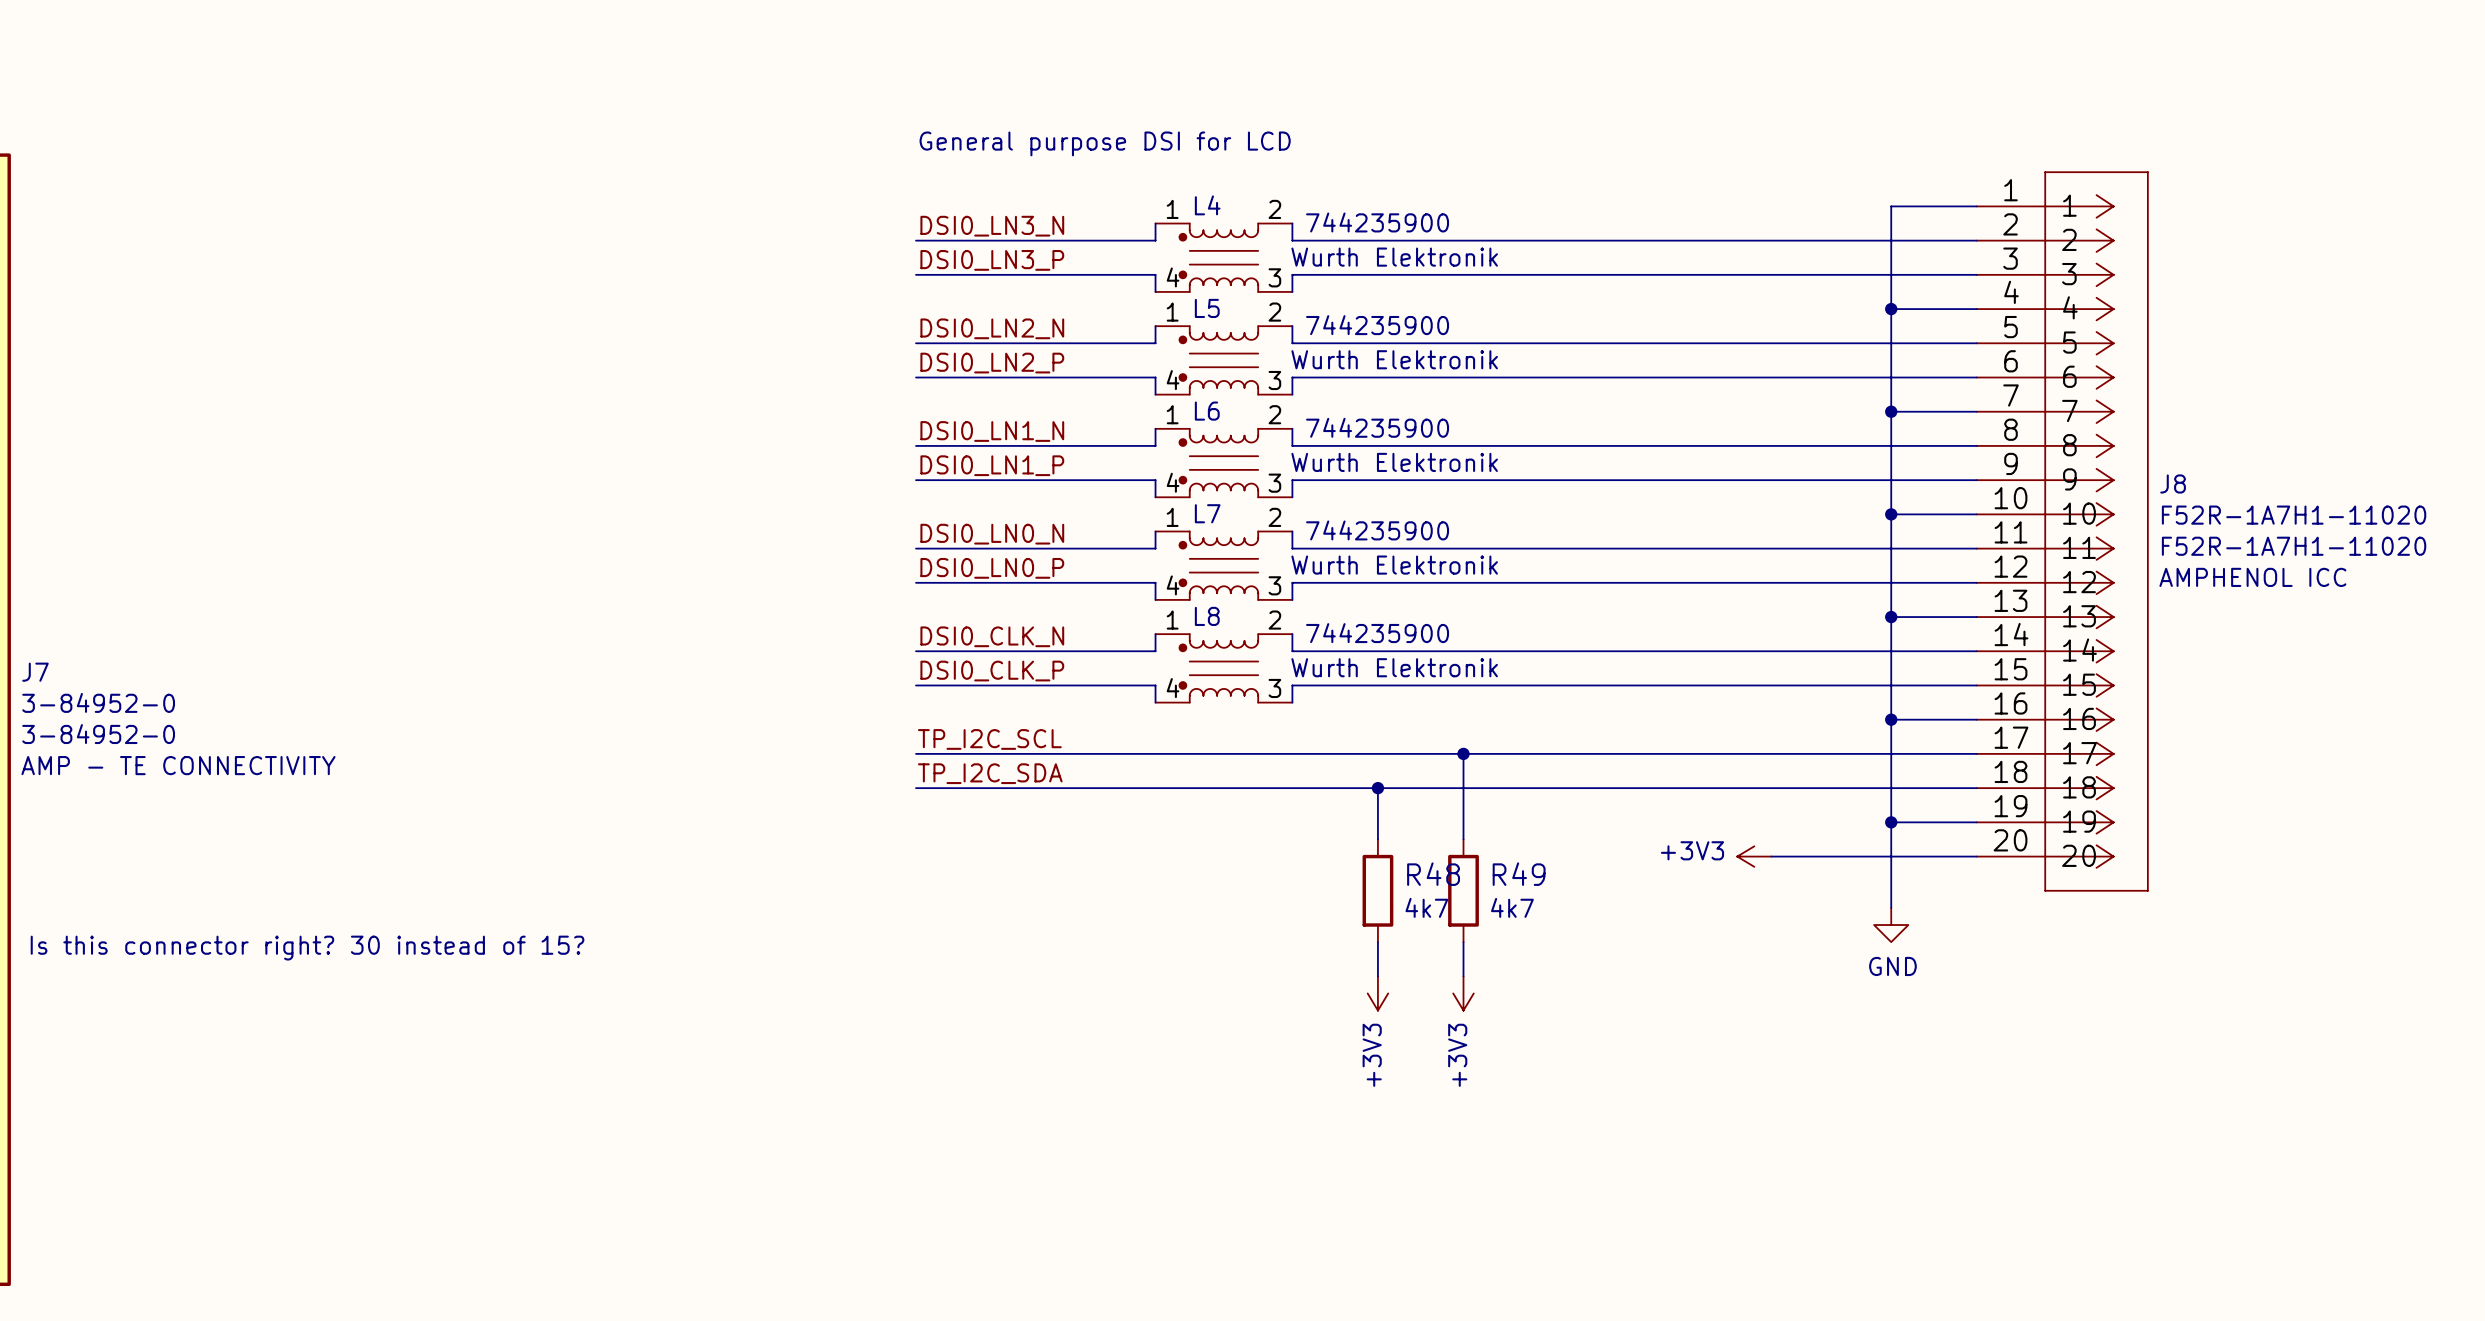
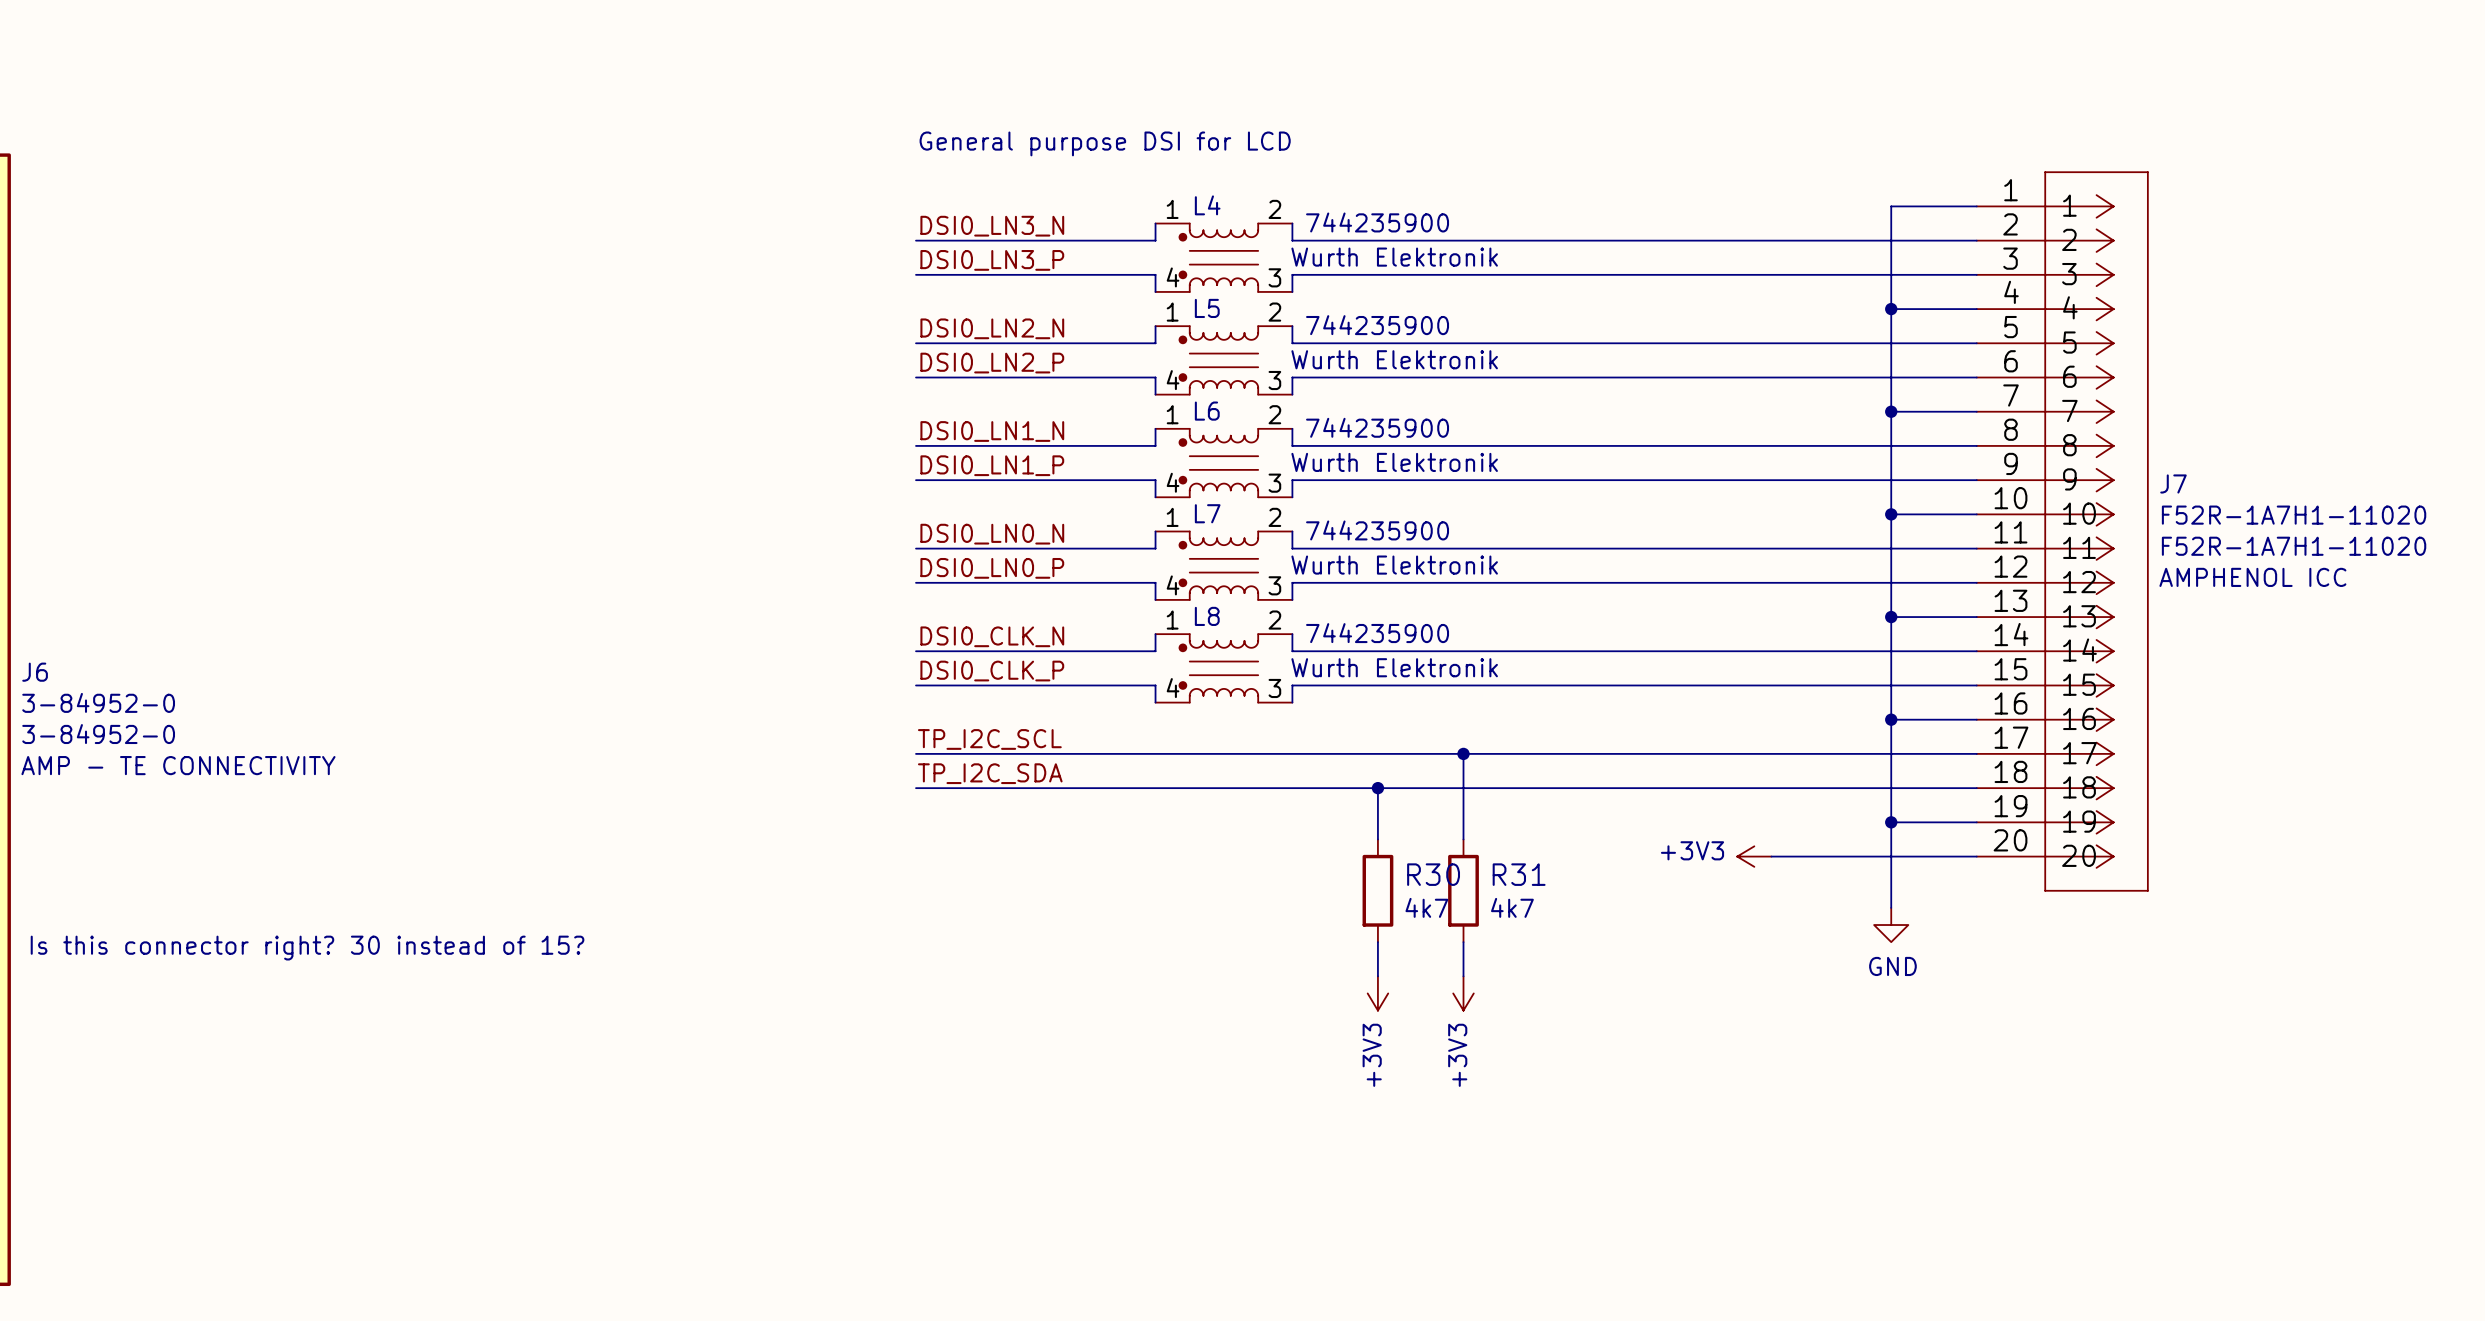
J8 name: J8 (2173, 483) -> J7 (2173, 483)
J7 name: J7 (35, 672) -> J6 (35, 672)
R48 name: R48 (1433, 874) -> R30 (1433, 874)
R49 name: R49 (1519, 874) -> R31 (1519, 874)

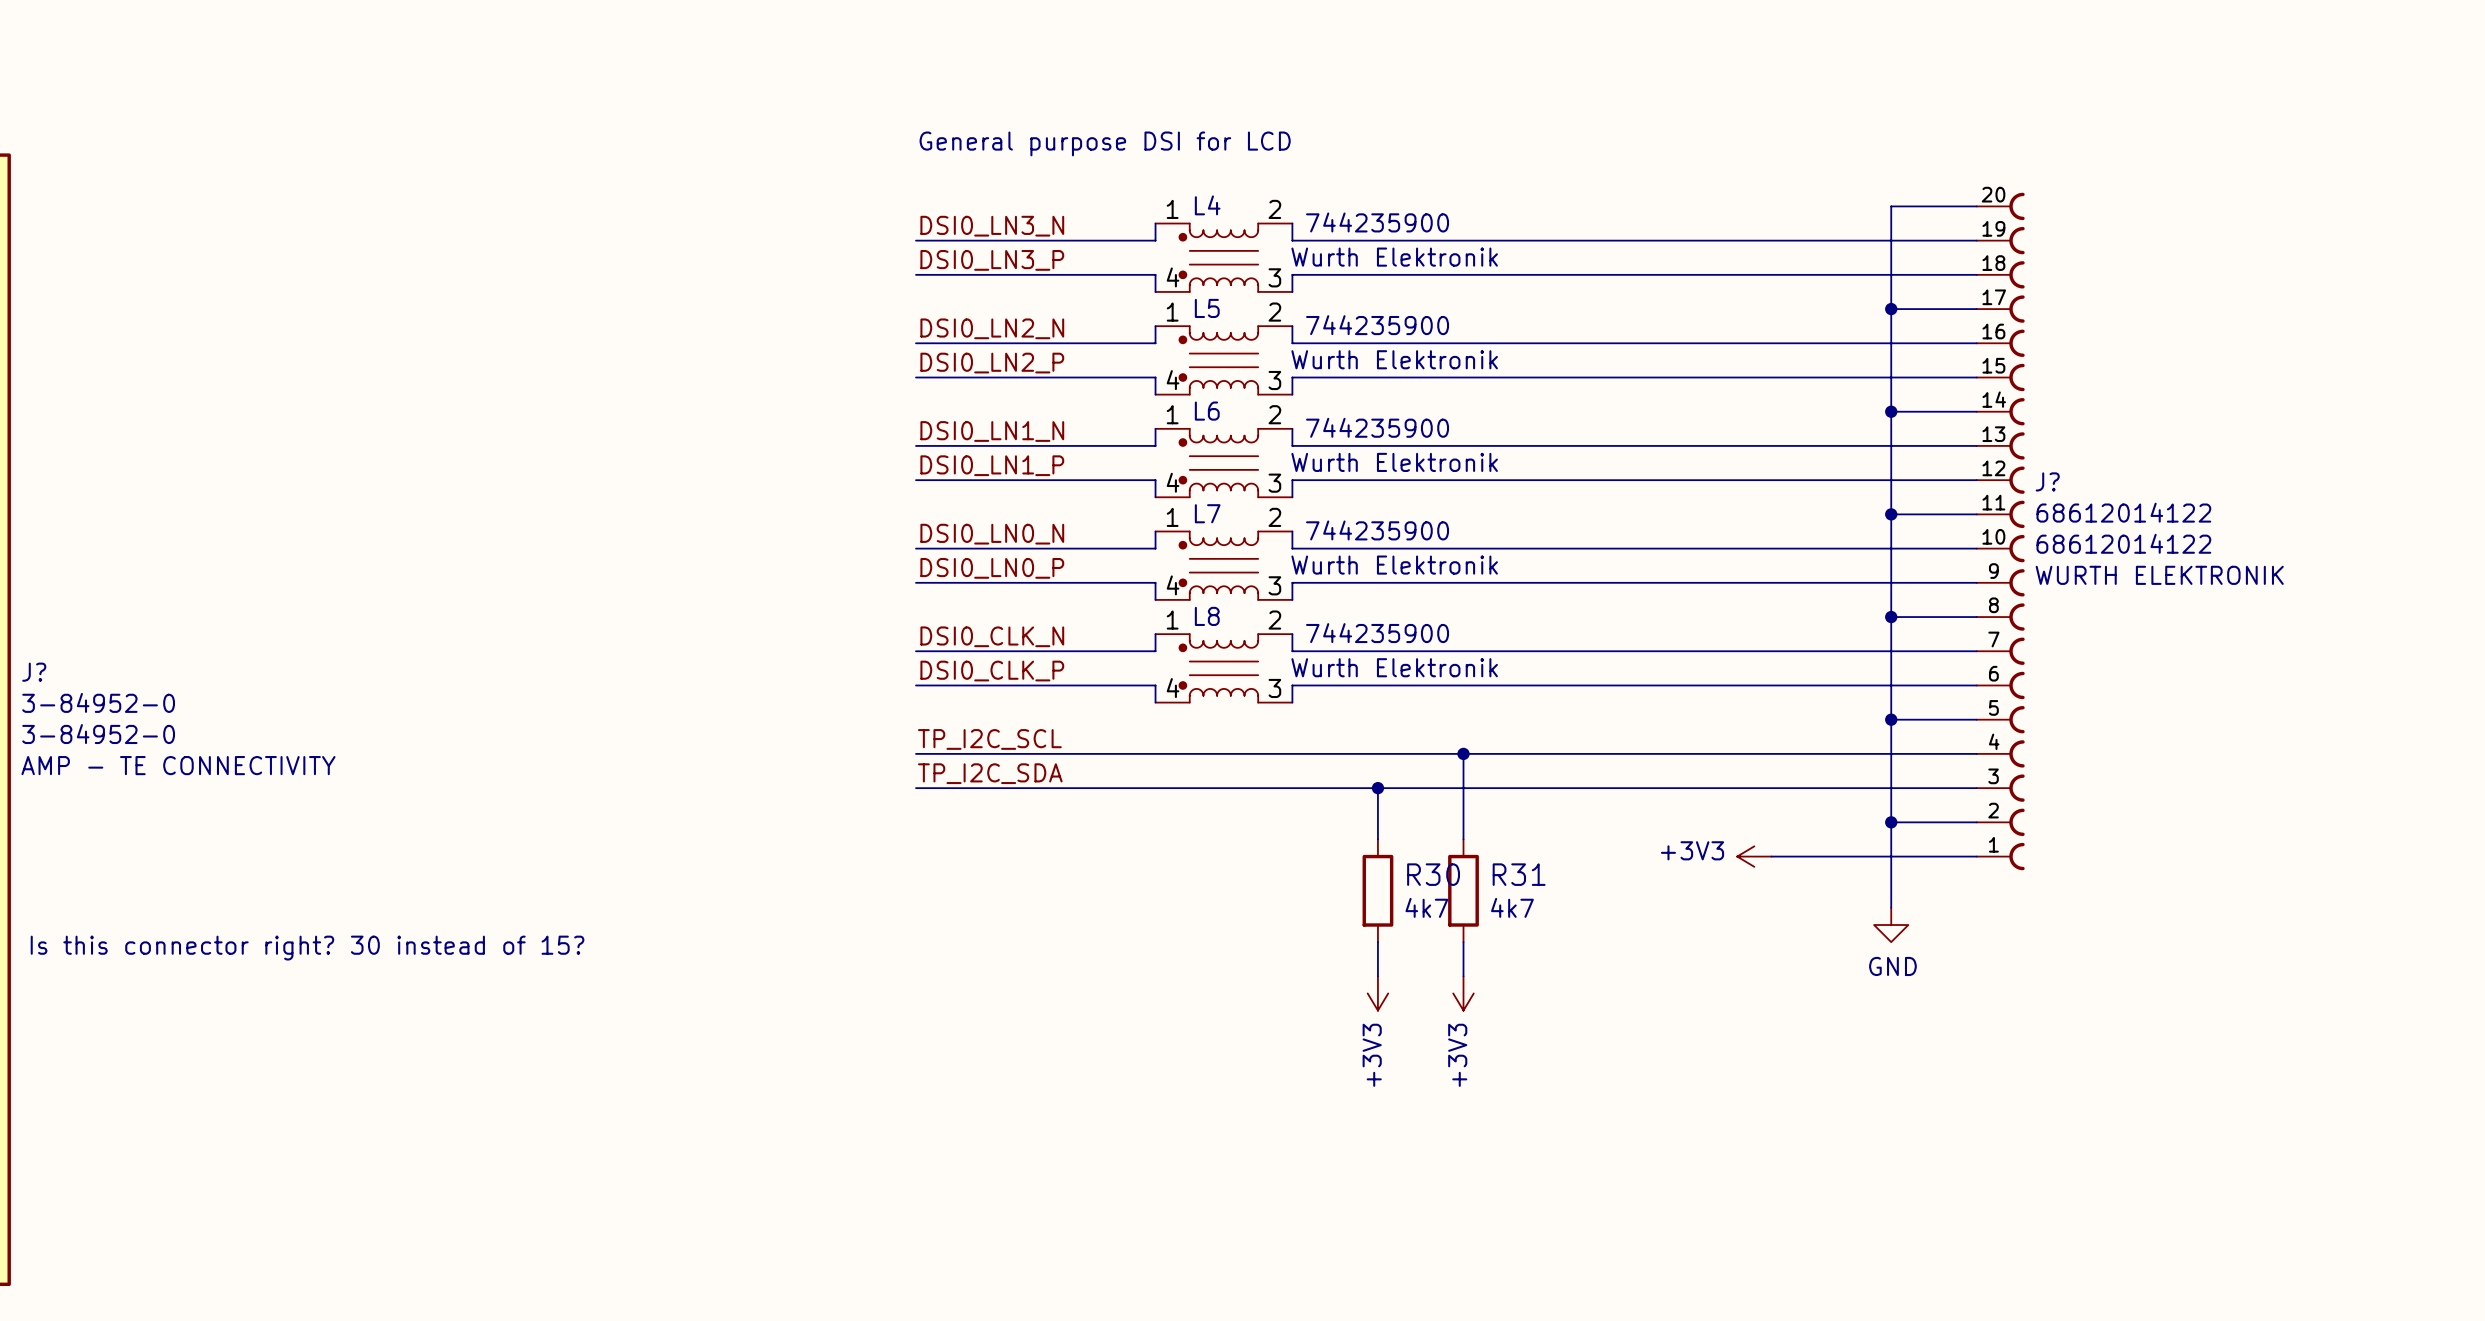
J?: none -> 68612014122 (2000, 531)
J7: F52R-1A7H1-11020 (2062, 531) -> none
J6 name: J6 (35, 672) -> J? (34, 672)

